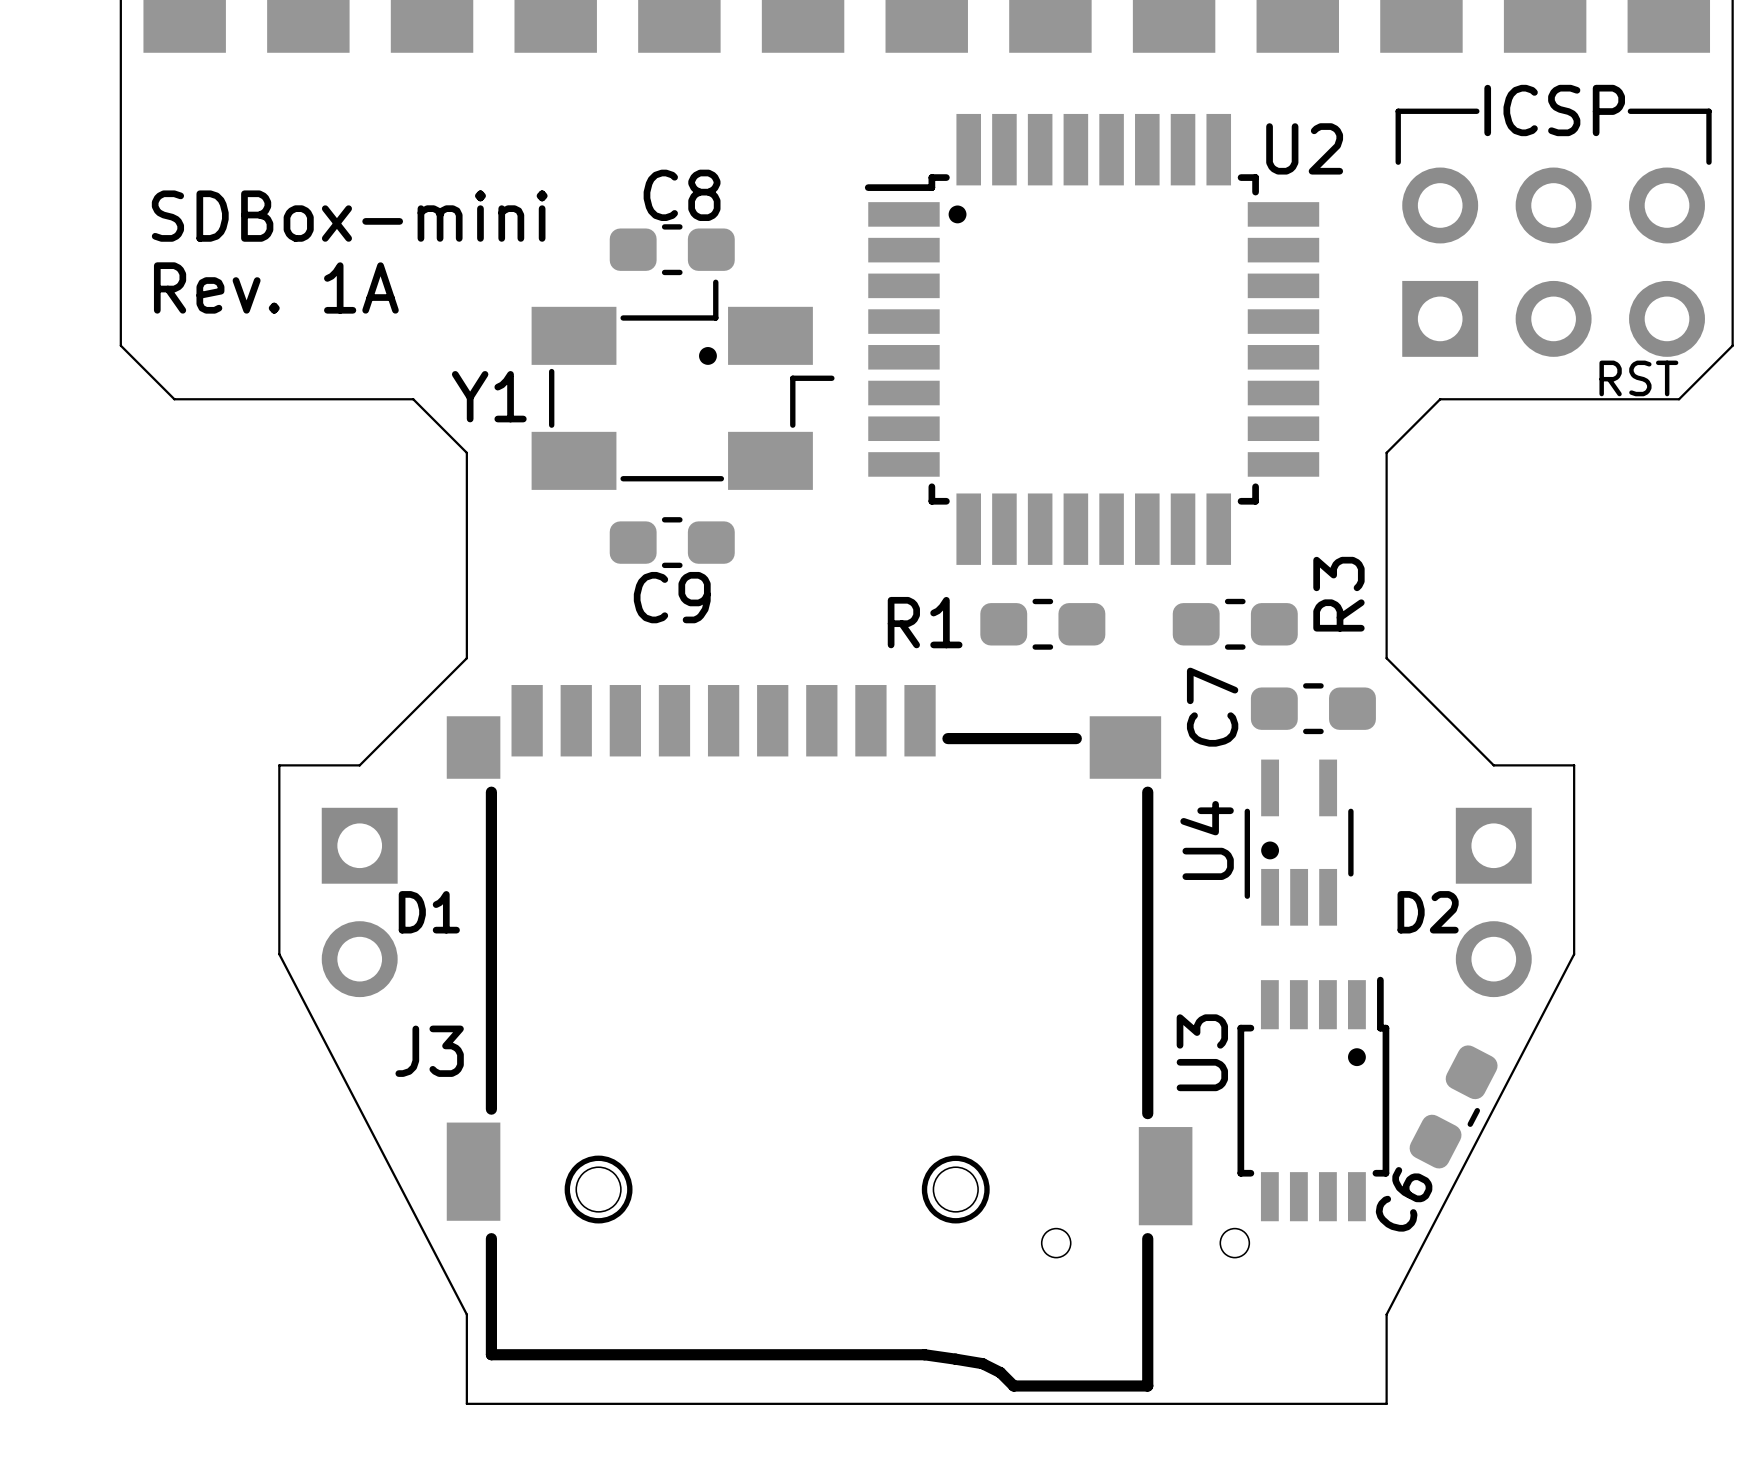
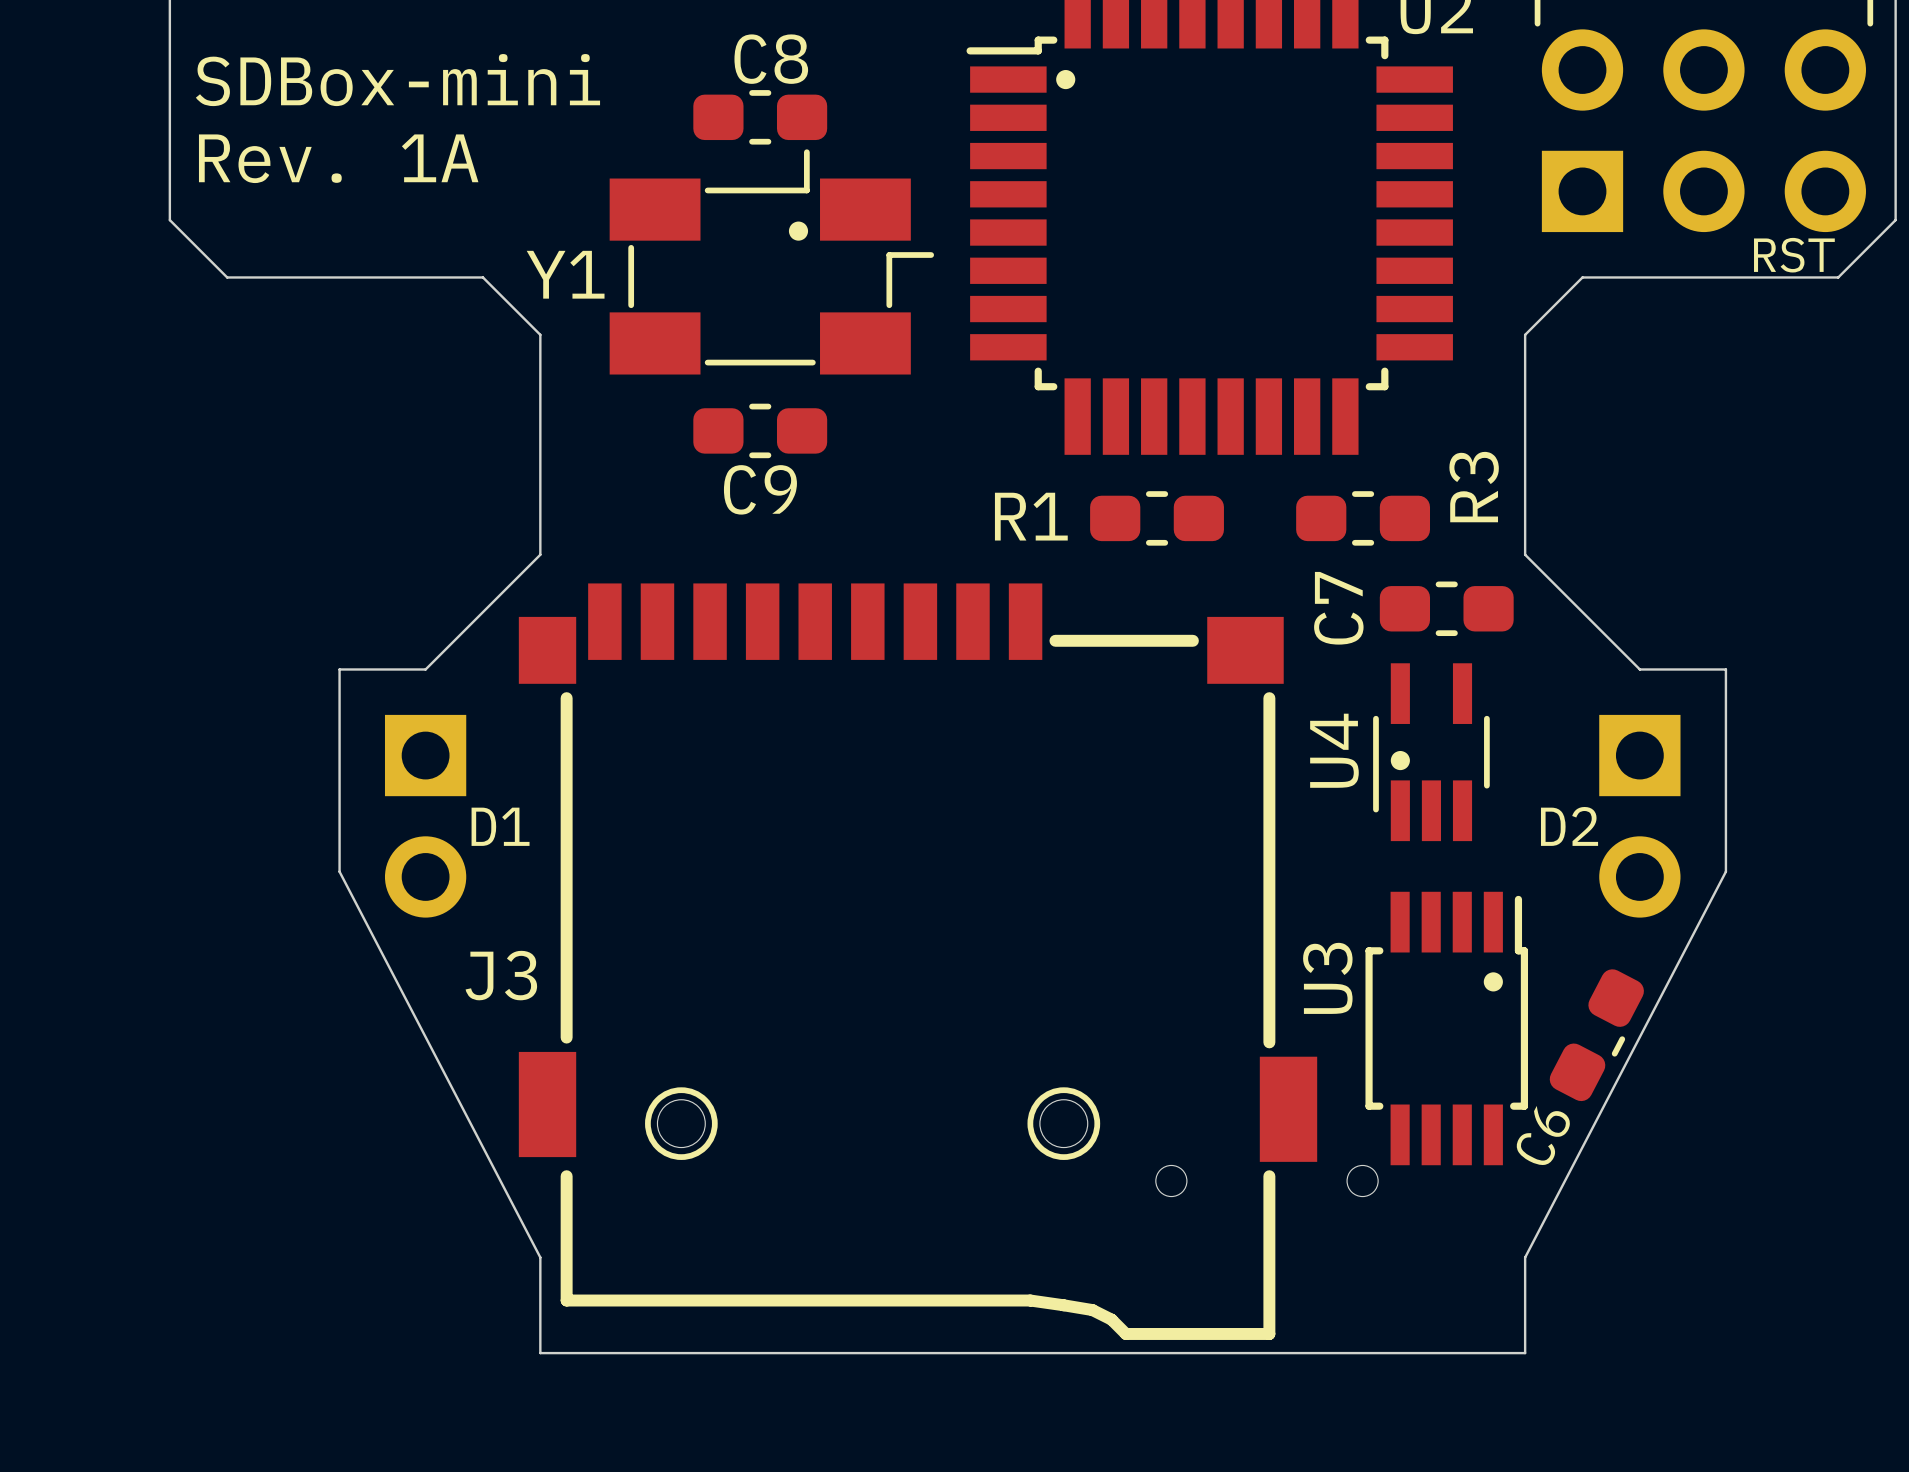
U3 footprint: [1237, 976, 1390, 1222] -> [1365, 891, 1529, 1166]

